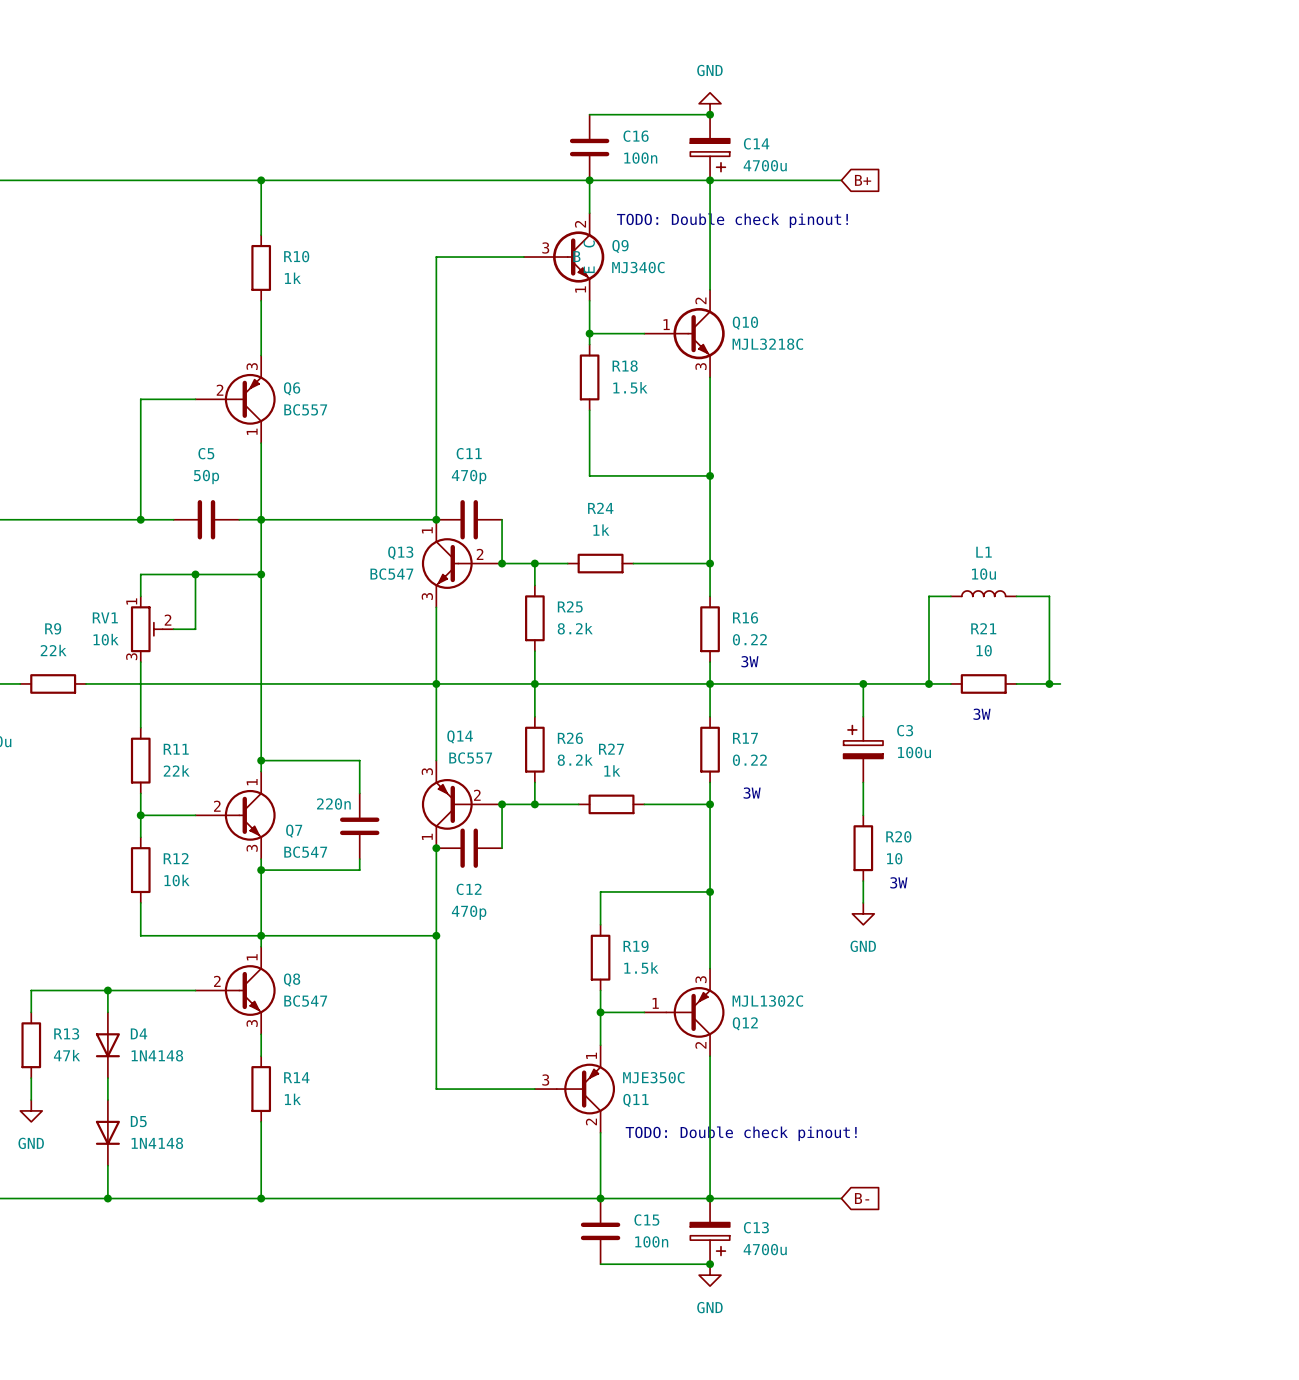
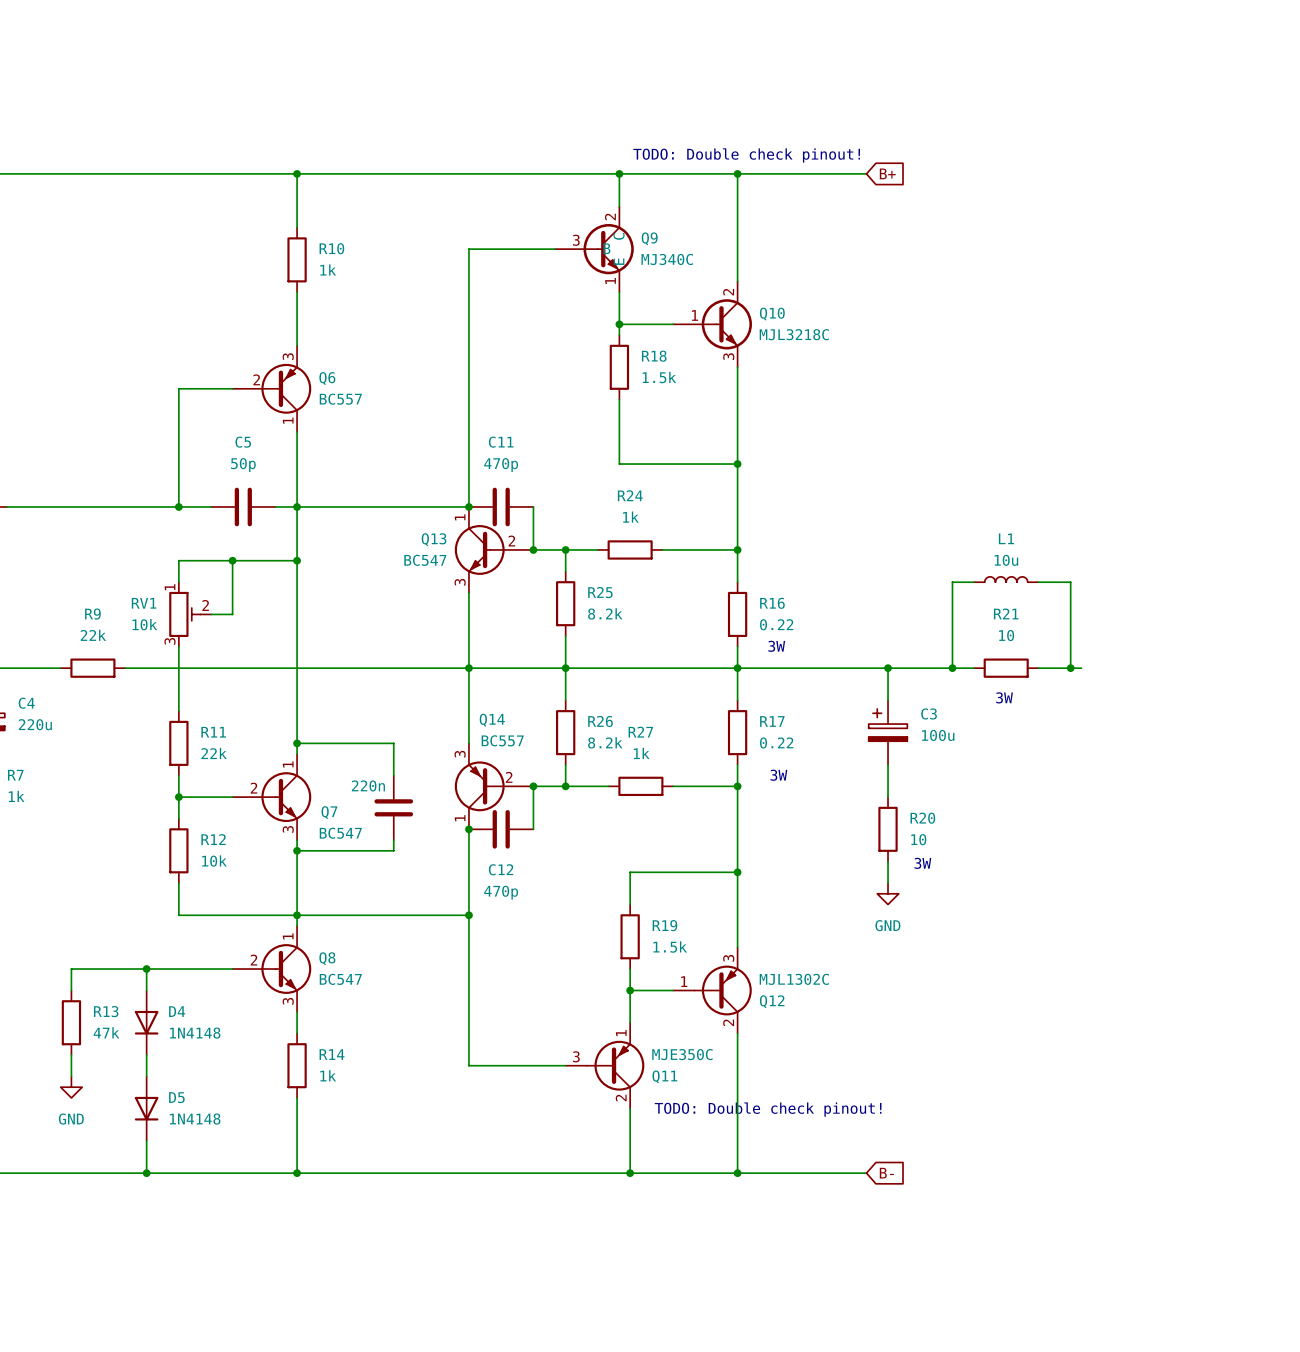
power symbol: GND (710, 103) -> none
wire: (589, 114) (710, 114) -> none
junction: (710, 114) -> none
C16: 100n (589, 147) -> none
C14: 4700u (710, 147) -> none
text position: TODO: Double check pinout! (732, 220) -> TODO: Double check pinout! (746, 155)
C15: 100n (600, 1231) -> none
C13: 4700u (710, 1231) -> none
wire: (600, 1264) (710, 1264) -> none
junction: (710, 1264) -> none
power symbol: GND (710, 1275) -> none

